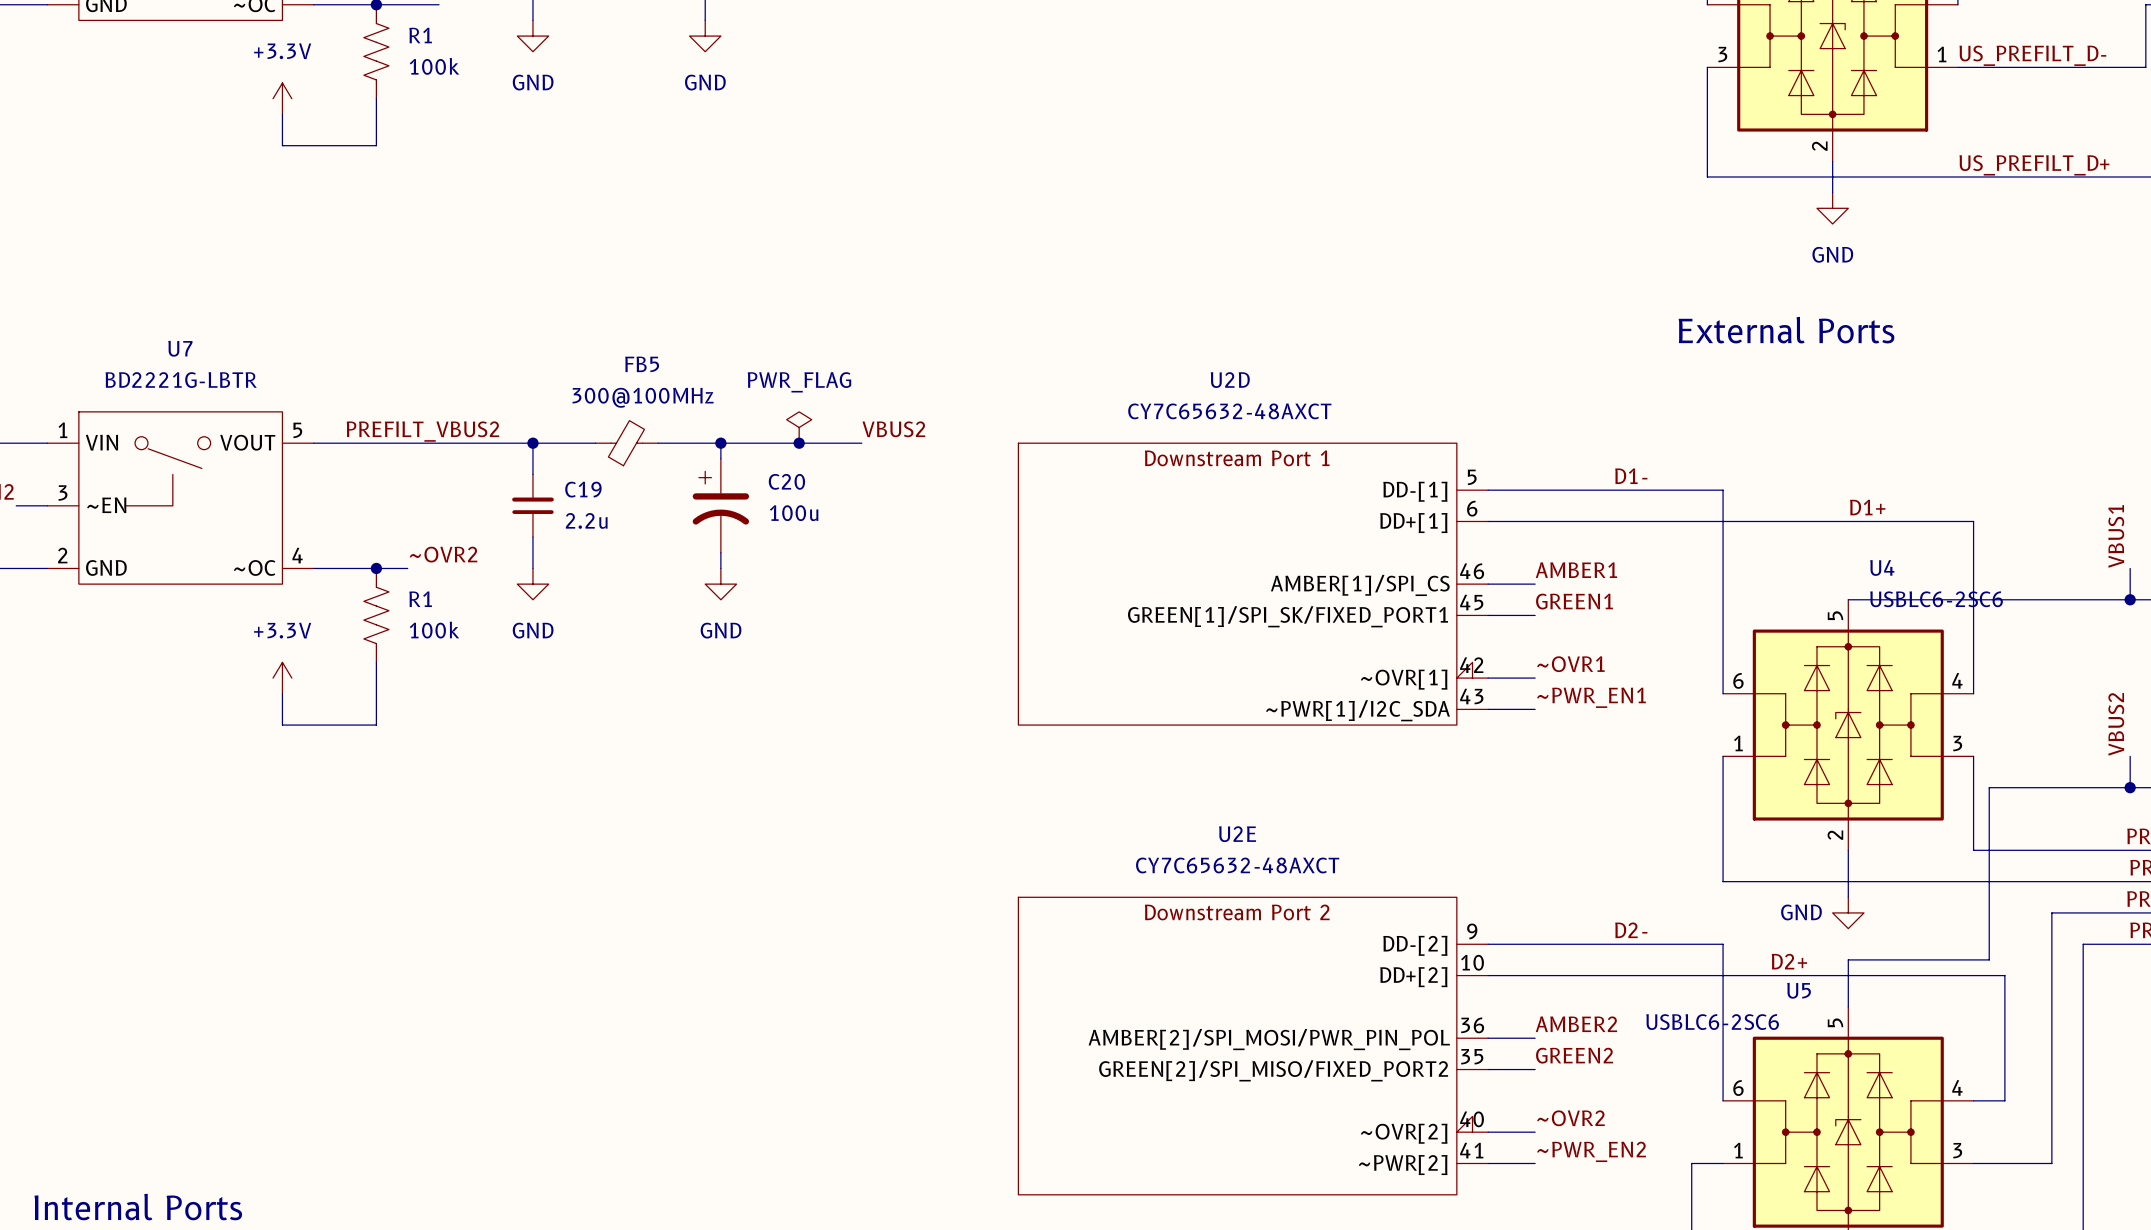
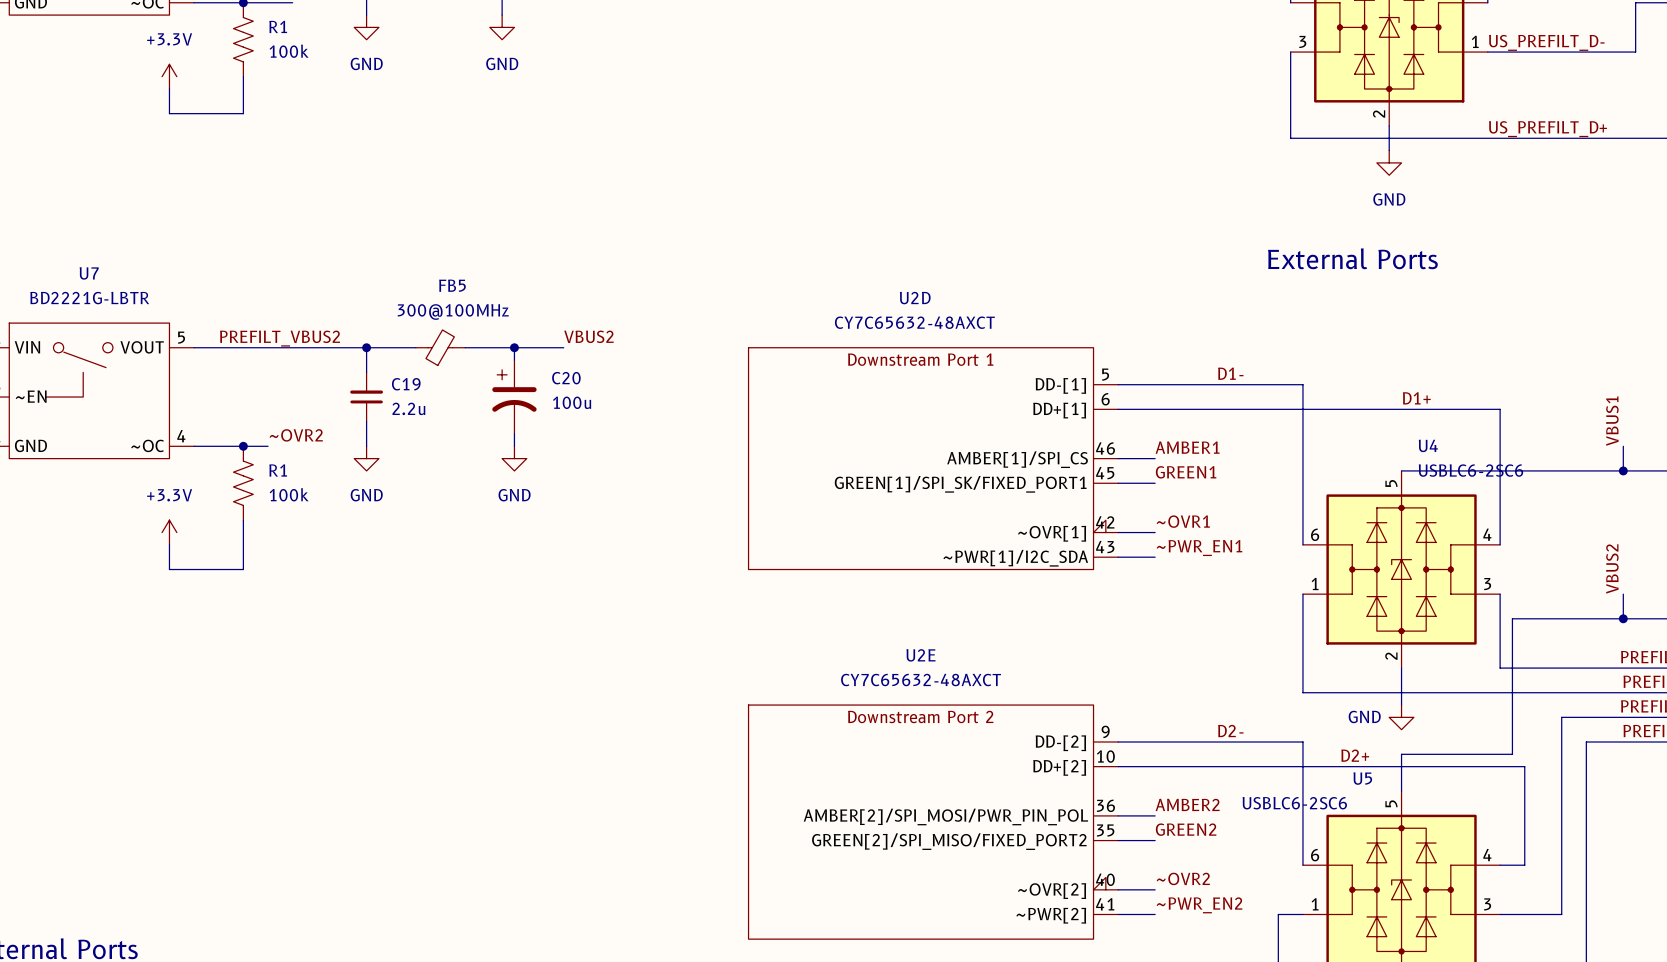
power symbol: PWR_FLAG (799, 427) -> none
label position: VBUS2 (893, 429) -> VBUS2 (588, 336)
wire: (783, 443) (861, 443) -> none
junction: (799, 443) -> none

